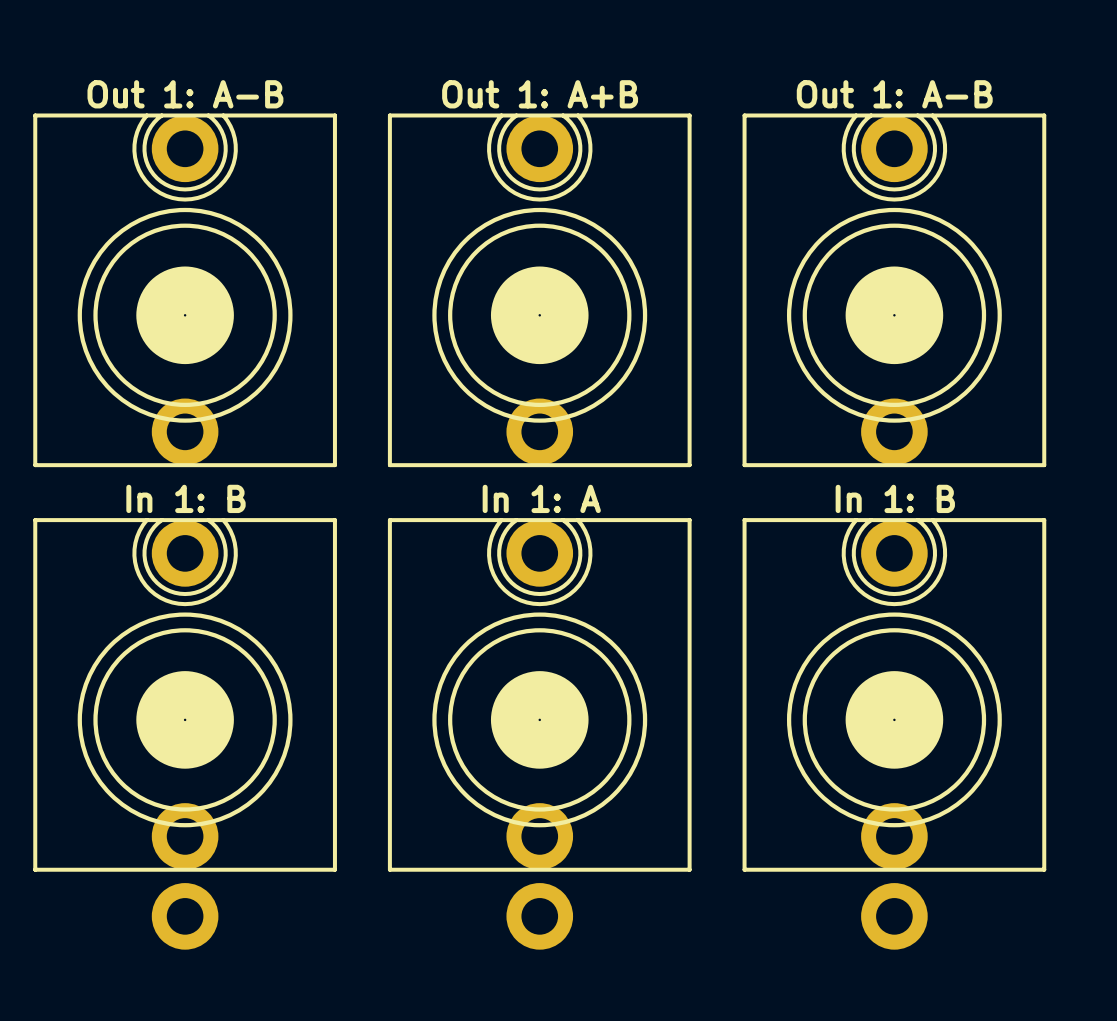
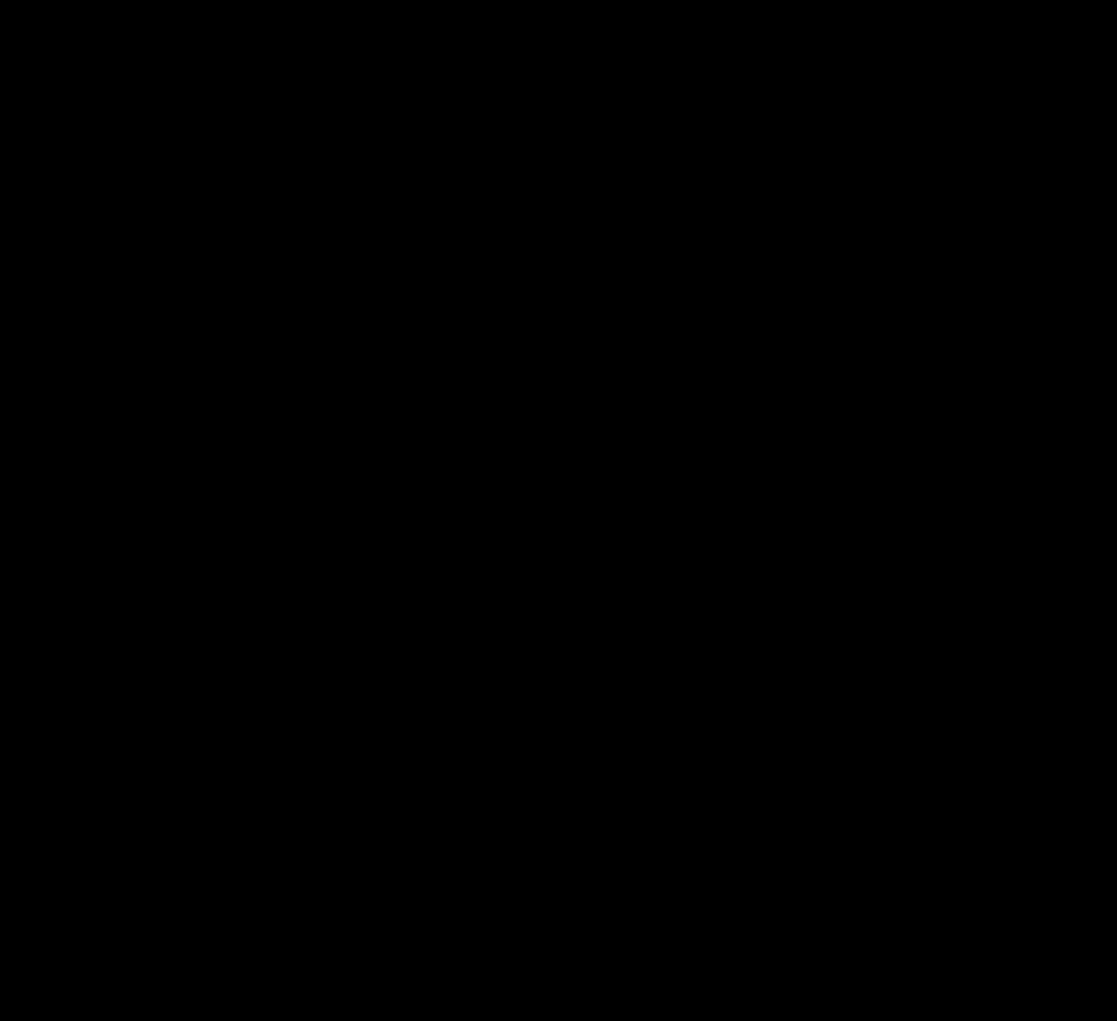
part: Out 1: A-B (185, 290) -> none
part: Out 1: A+B (539, 290) -> none
part: Out 1: A-B (894, 290) -> none
part: In 1: B (185, 733) -> none
part: In 1: A (539, 733) -> none
part: In 1: B (894, 733) -> none

